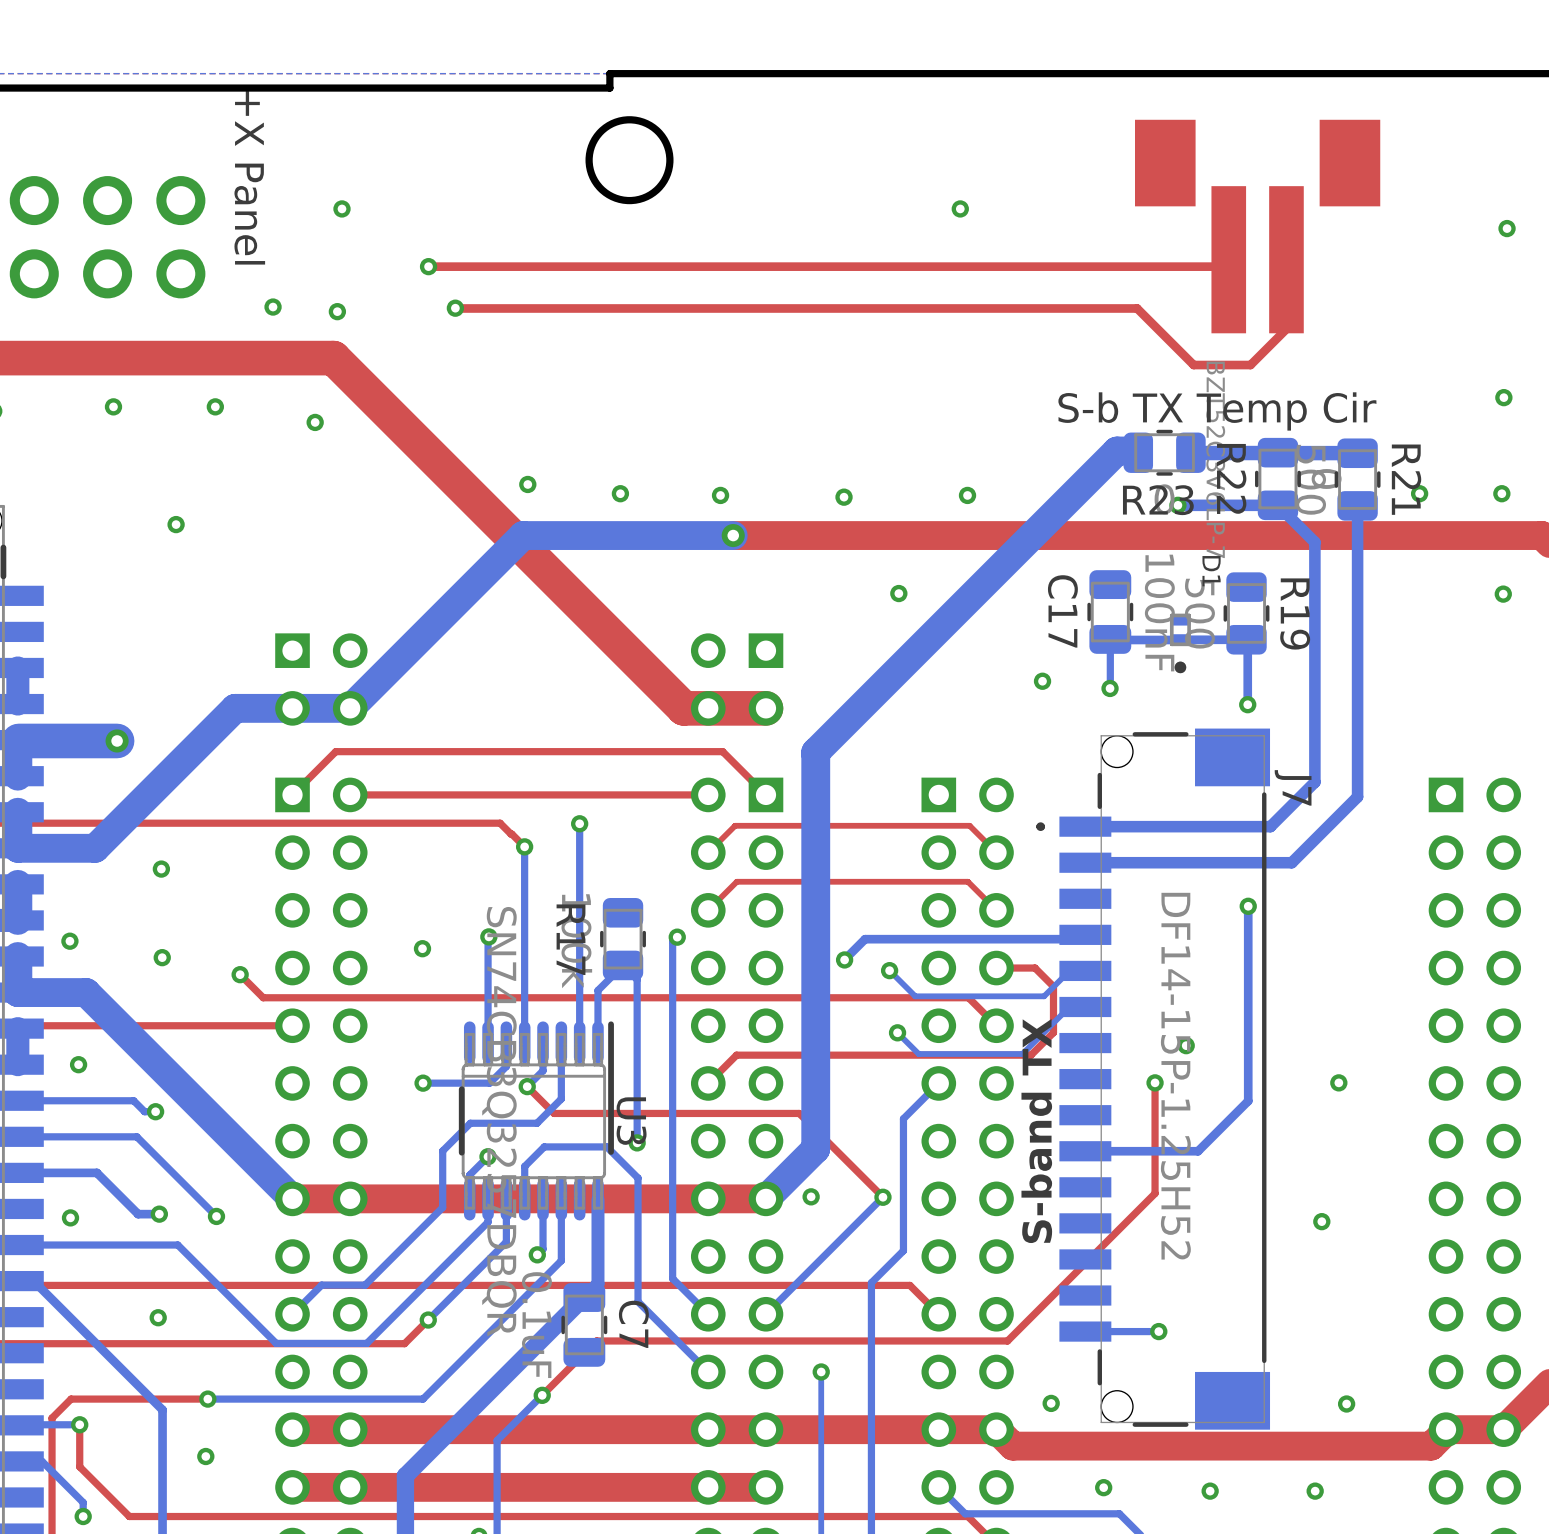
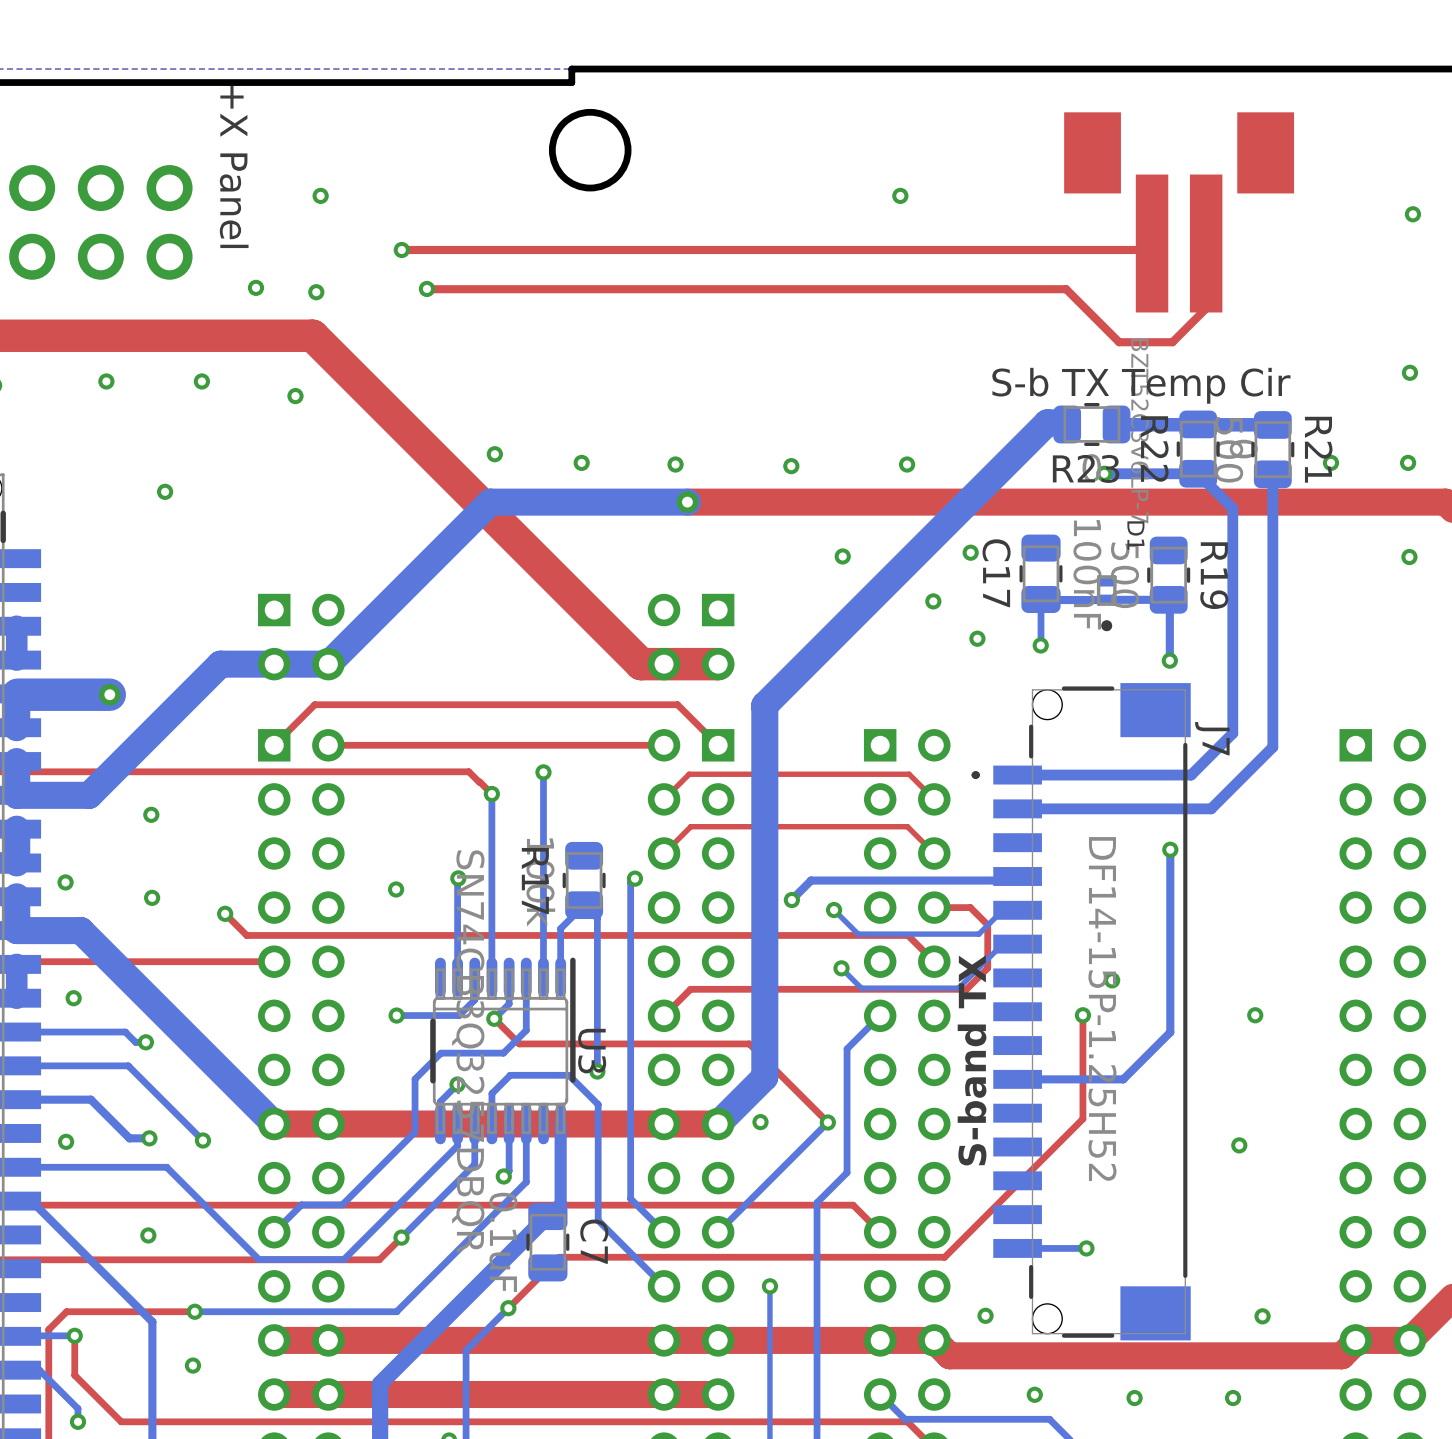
via: none -> (970, 552)
via: none -> (933, 601)

